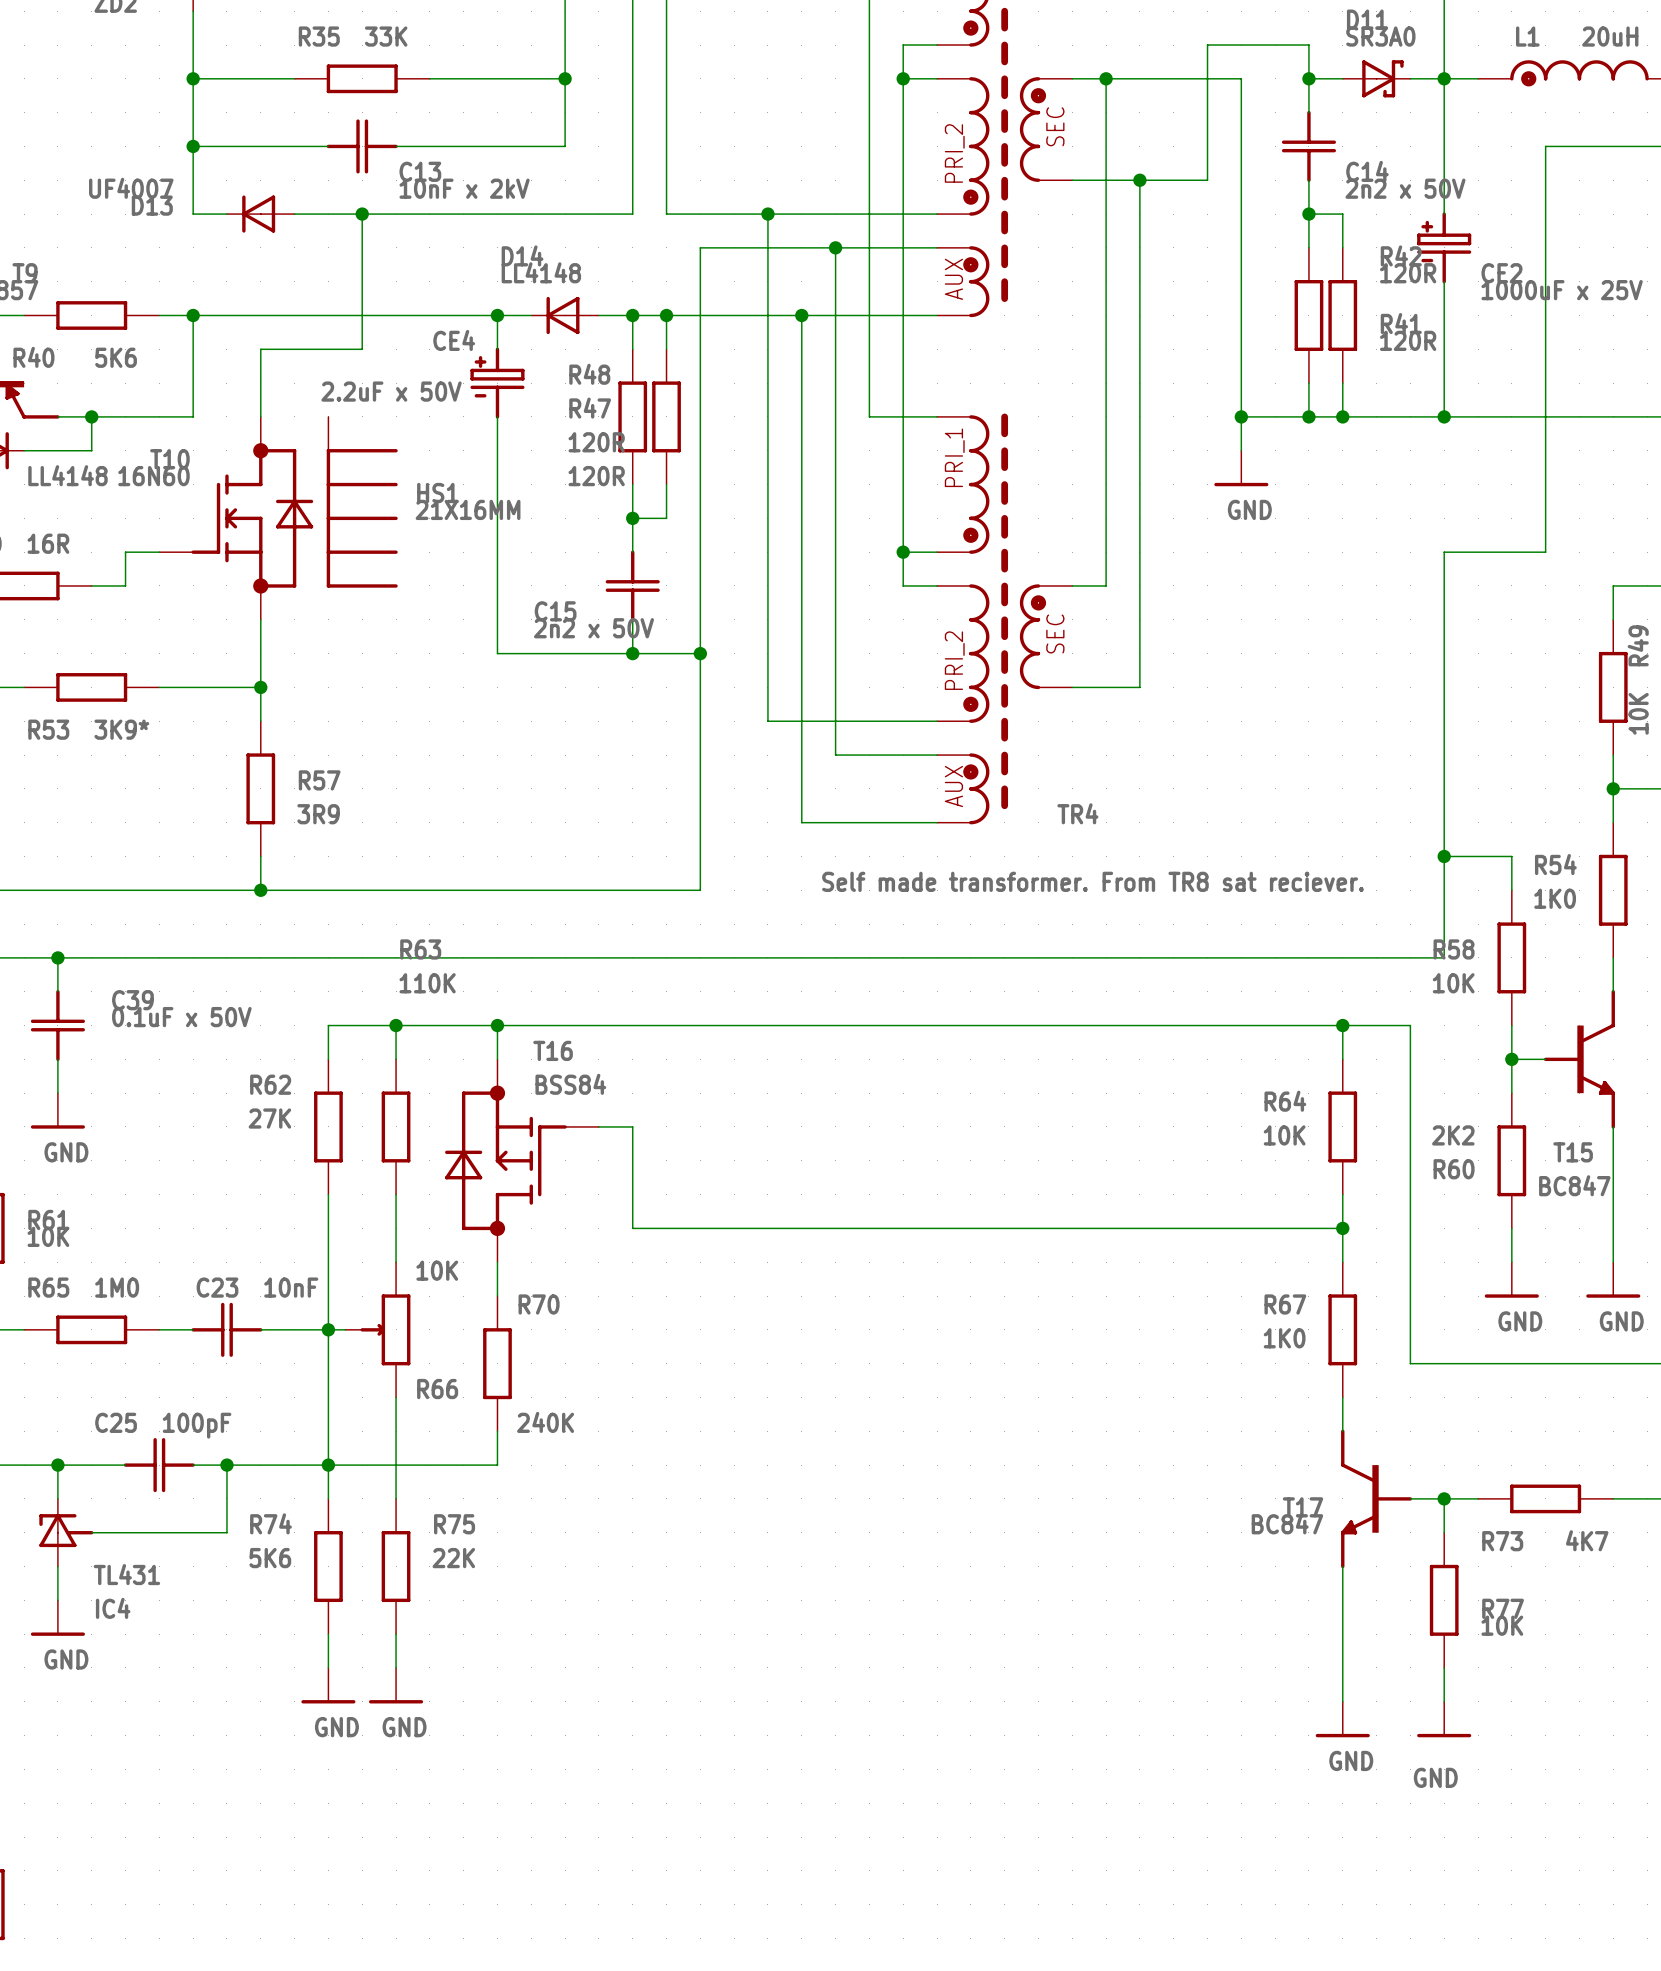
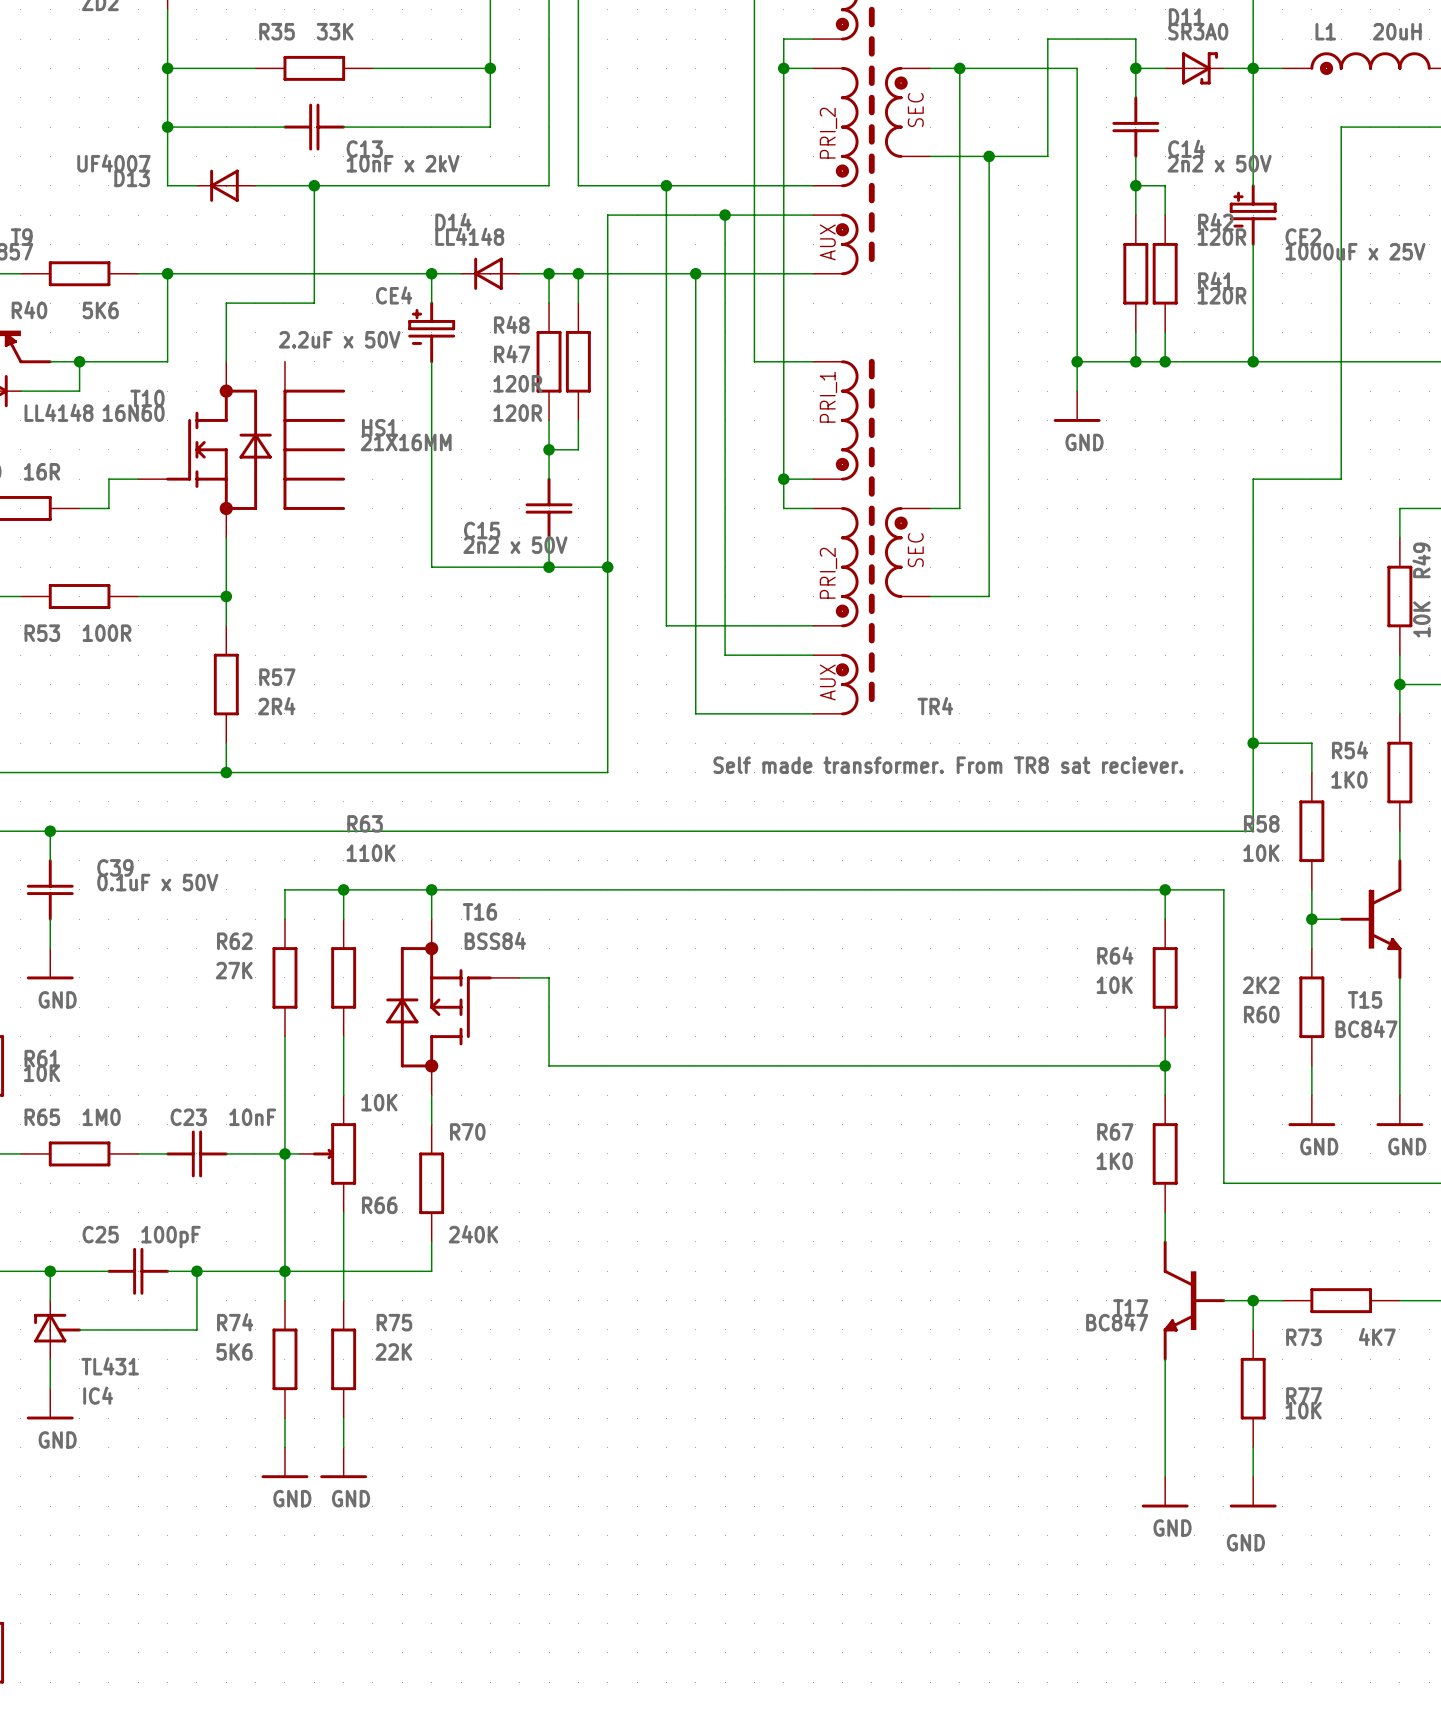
R53 value: 3K9* (121, 729) -> 100R (106, 633)
R57 value: 3R9 (318, 814) -> 2R4 (276, 706)

